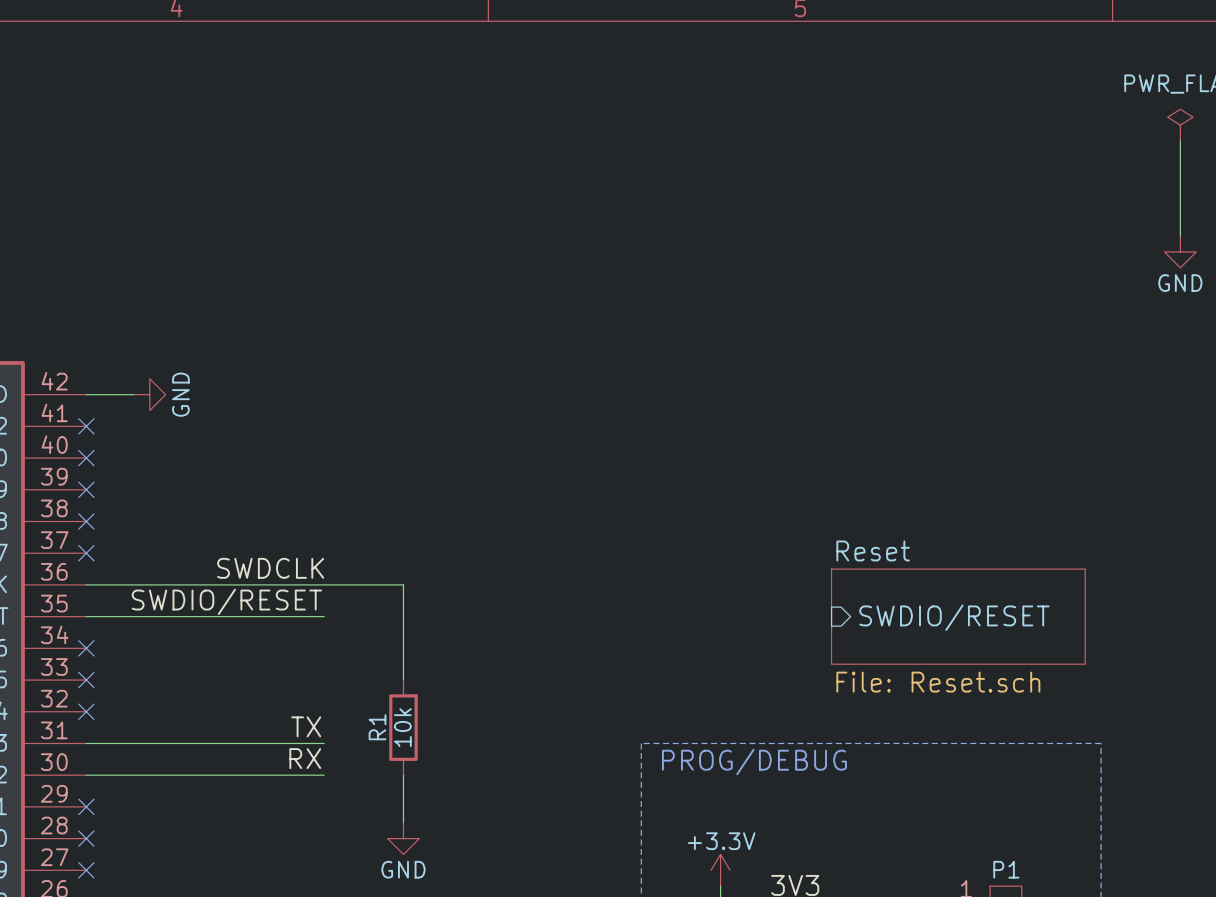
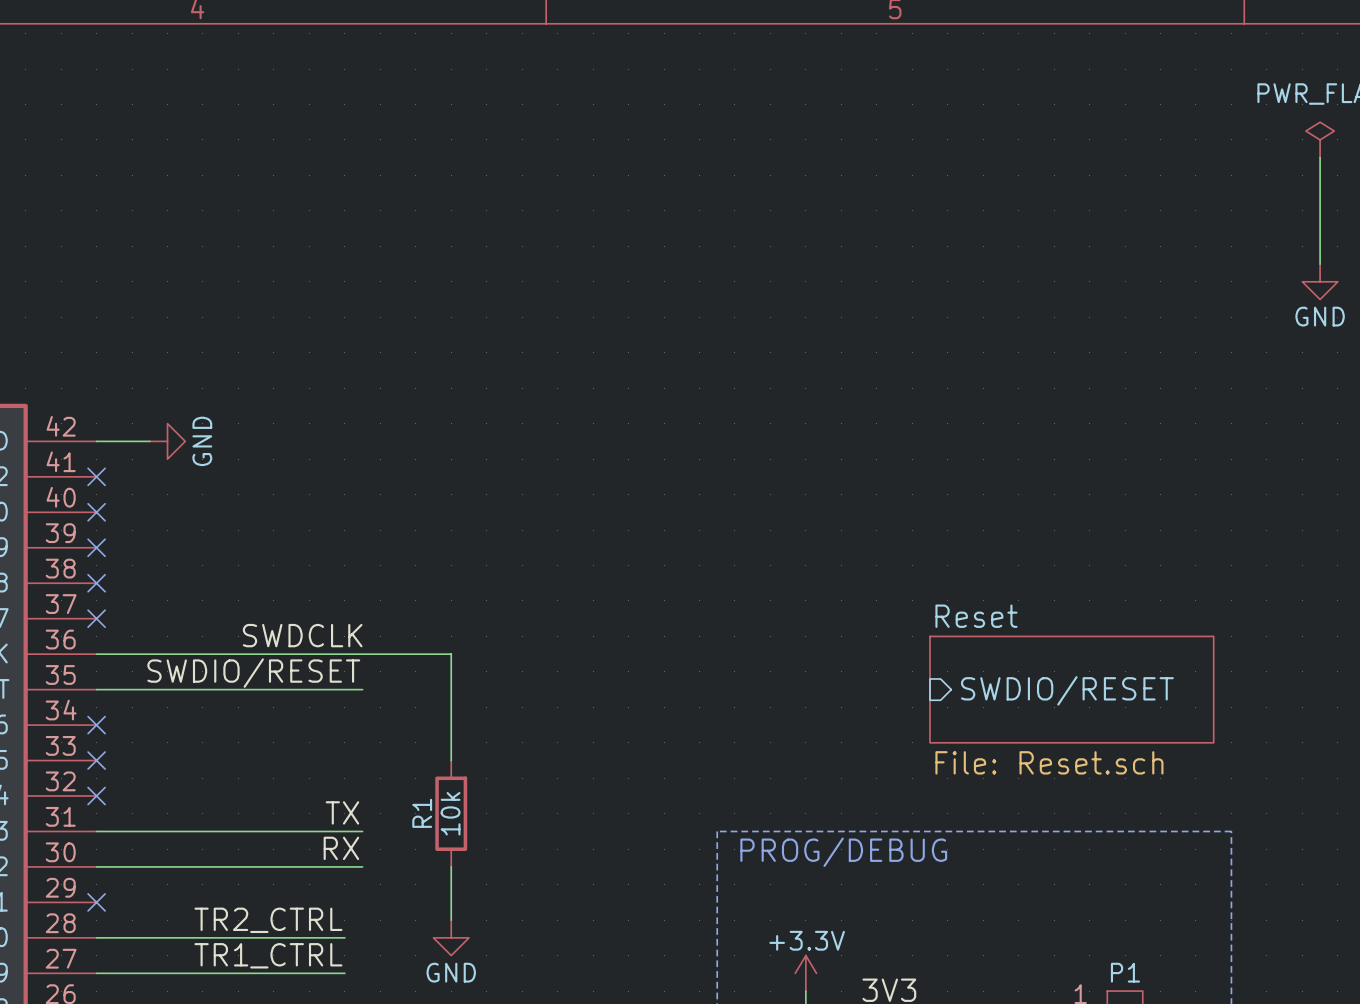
label: none -> TR2_CTRL (268, 920)
wire: none -> (96, 937) (344, 937)
no-connect mark: (86, 838) -> none
label: none -> TR1_CTRL (268, 955)
wire: none -> (96, 973) (344, 973)
no-connect mark: (86, 870) -> none

